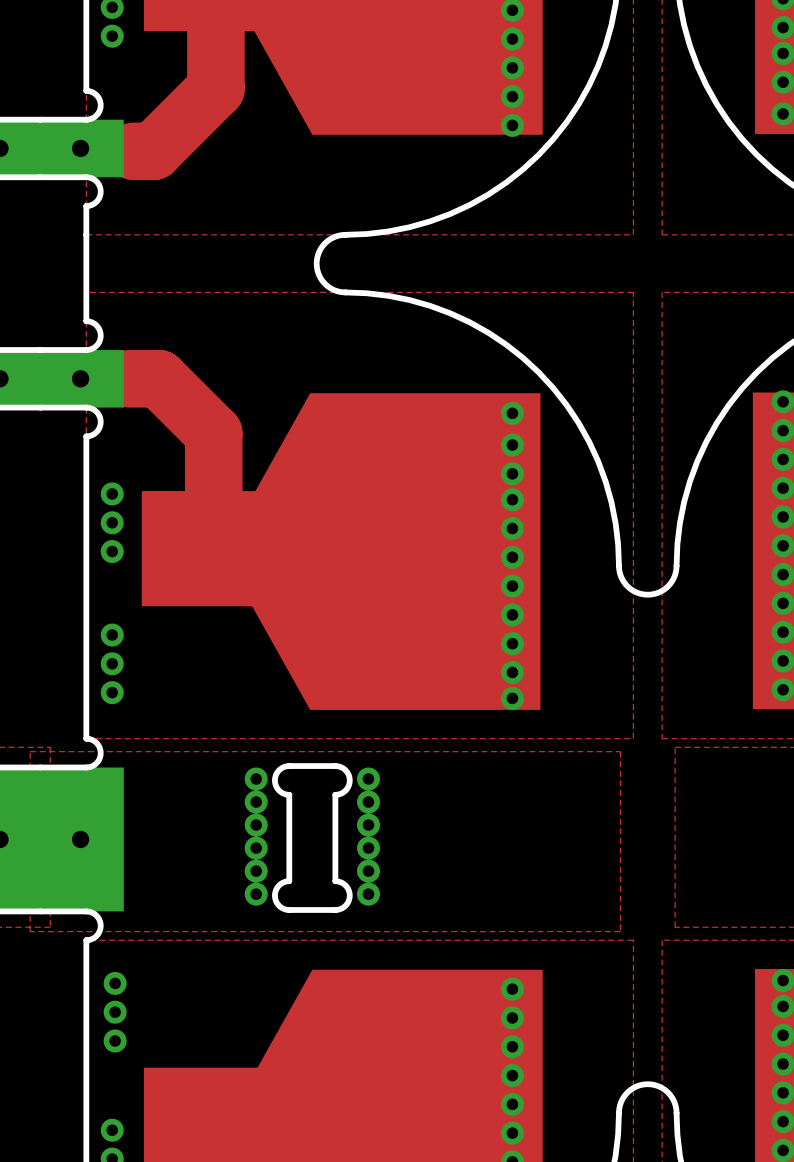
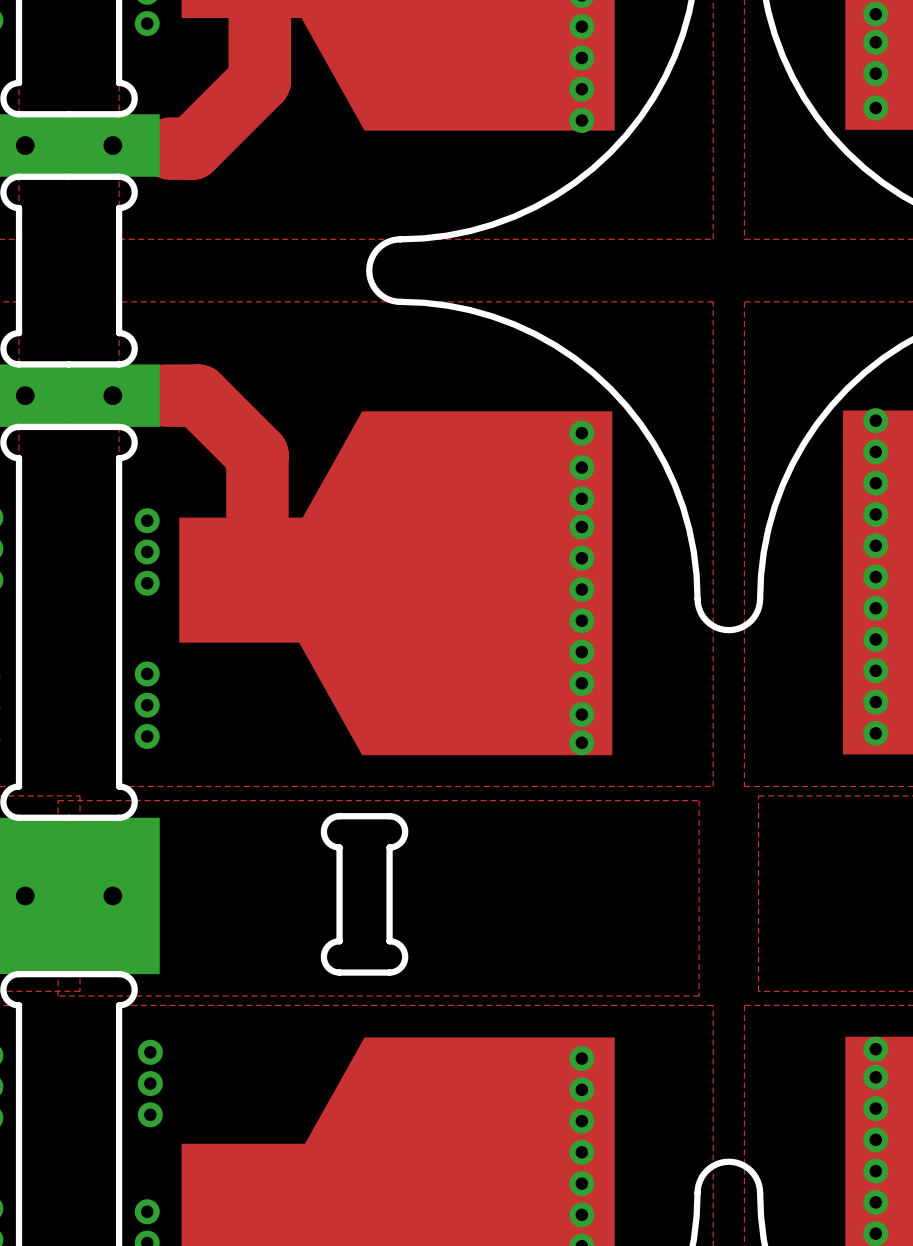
via: (256, 779) -> none
via: (368, 779) -> none
via: (256, 802) -> none
via: (368, 802) -> none
via: (256, 825) -> none
via: (368, 825) -> none
via: (256, 848) -> none
via: (368, 848) -> none
via: (256, 871) -> none
via: (368, 871) -> none
via: (256, 894) -> none
via: (368, 894) -> none

